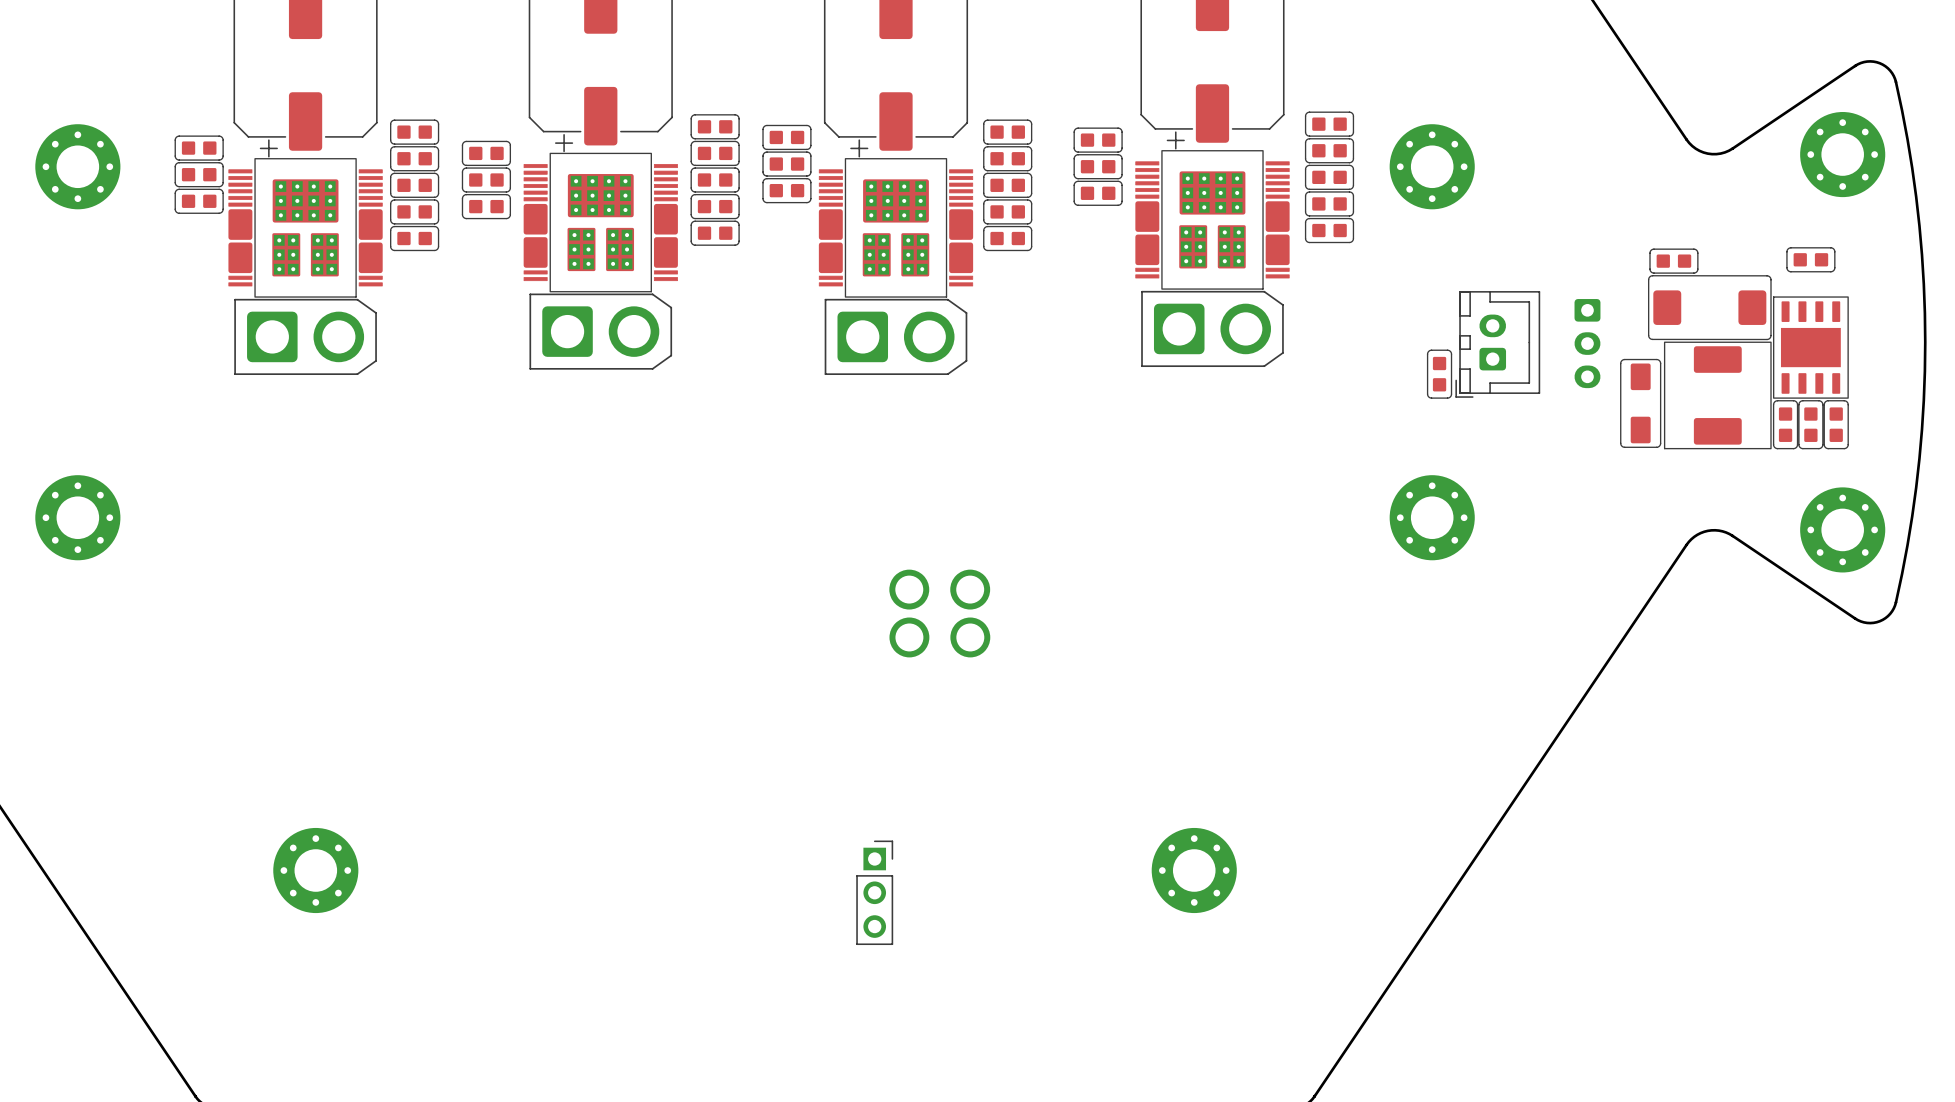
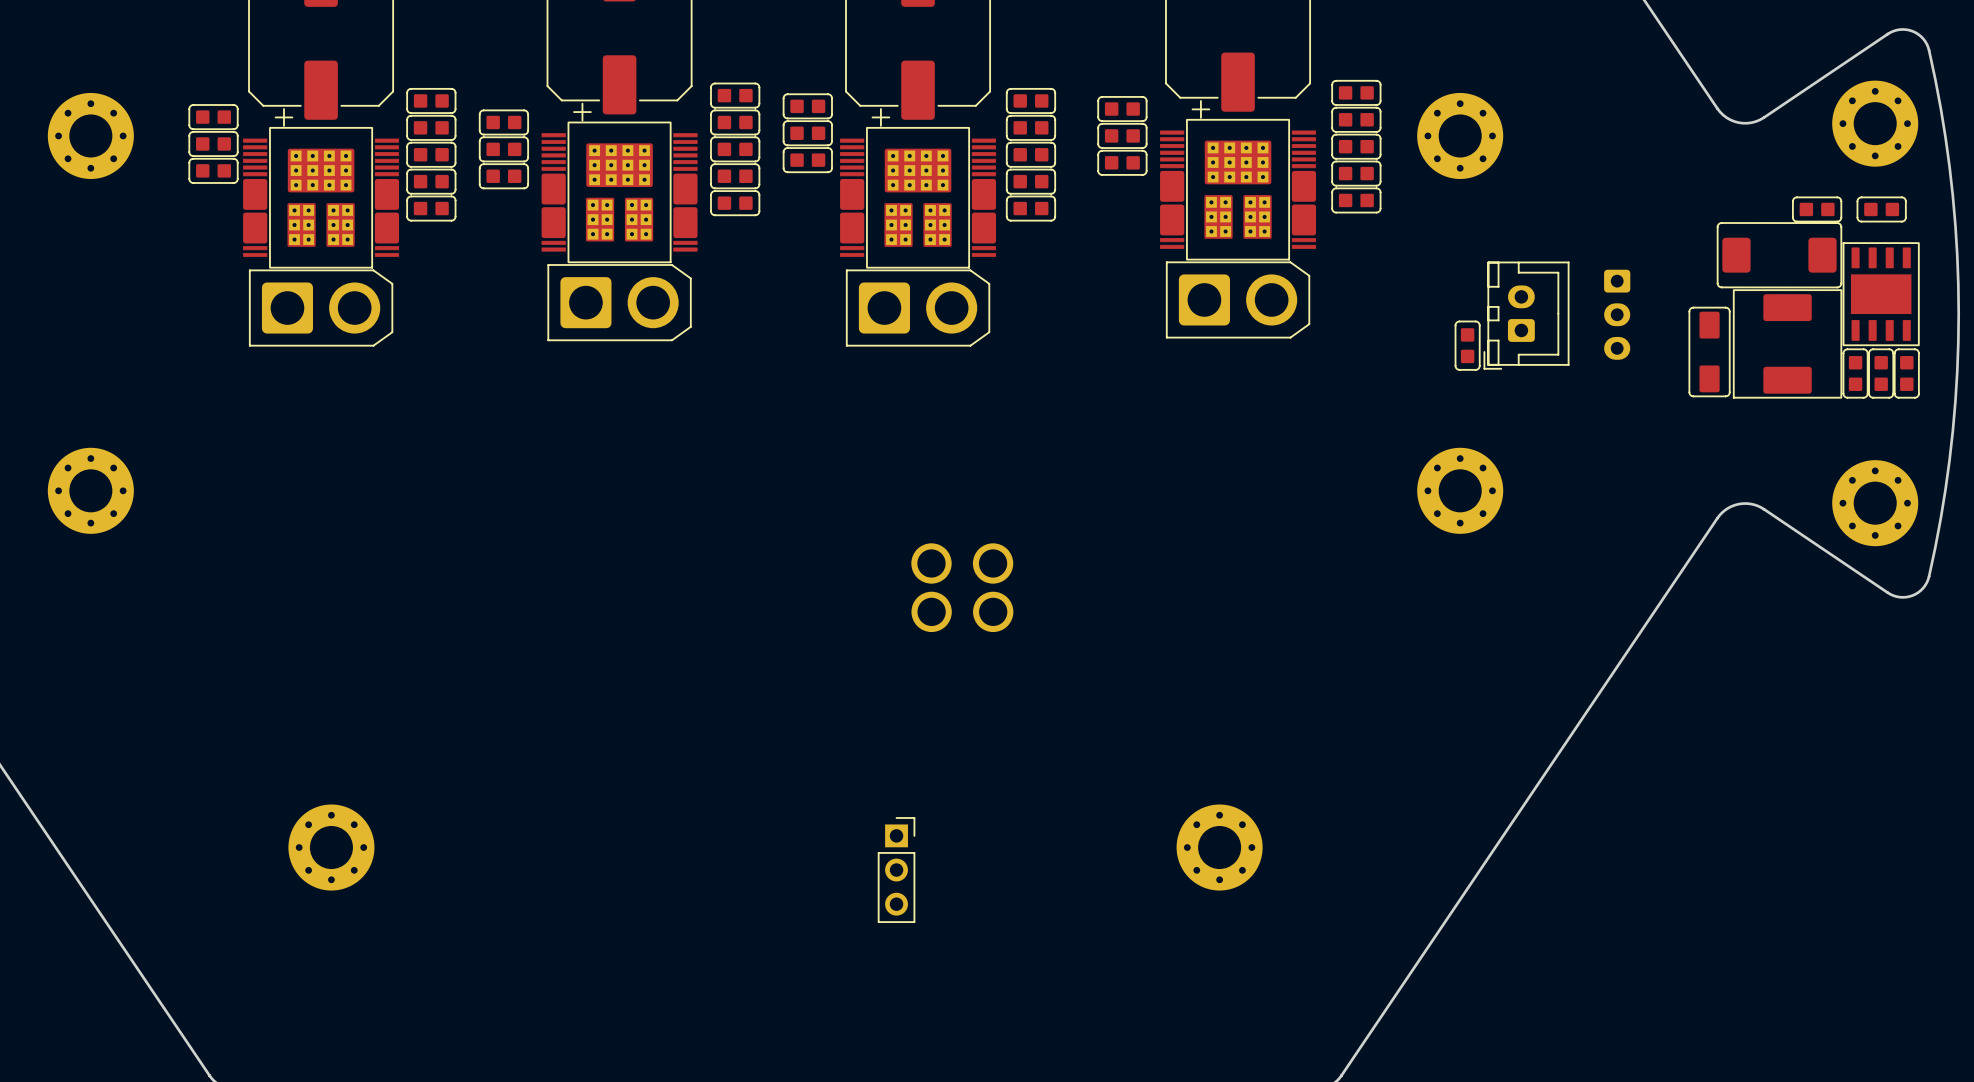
part: none -> (1817, 209)
part: none -> (1881, 209)
part: (1810, 259) -> none
part: (1673, 261) -> none
part: none -> (1779, 255)
part: (1709, 307) -> none
part position: (1810, 347) -> (1881, 294)
part position: (1717, 395) -> (1787, 343)
part: none -> (1855, 373)
part: none -> (1881, 373)
part: none -> (1906, 373)
part position: (1640, 403) -> (1709, 351)
part: (1785, 424) -> none
part: (1810, 424) -> none
part: (1836, 424) -> none

